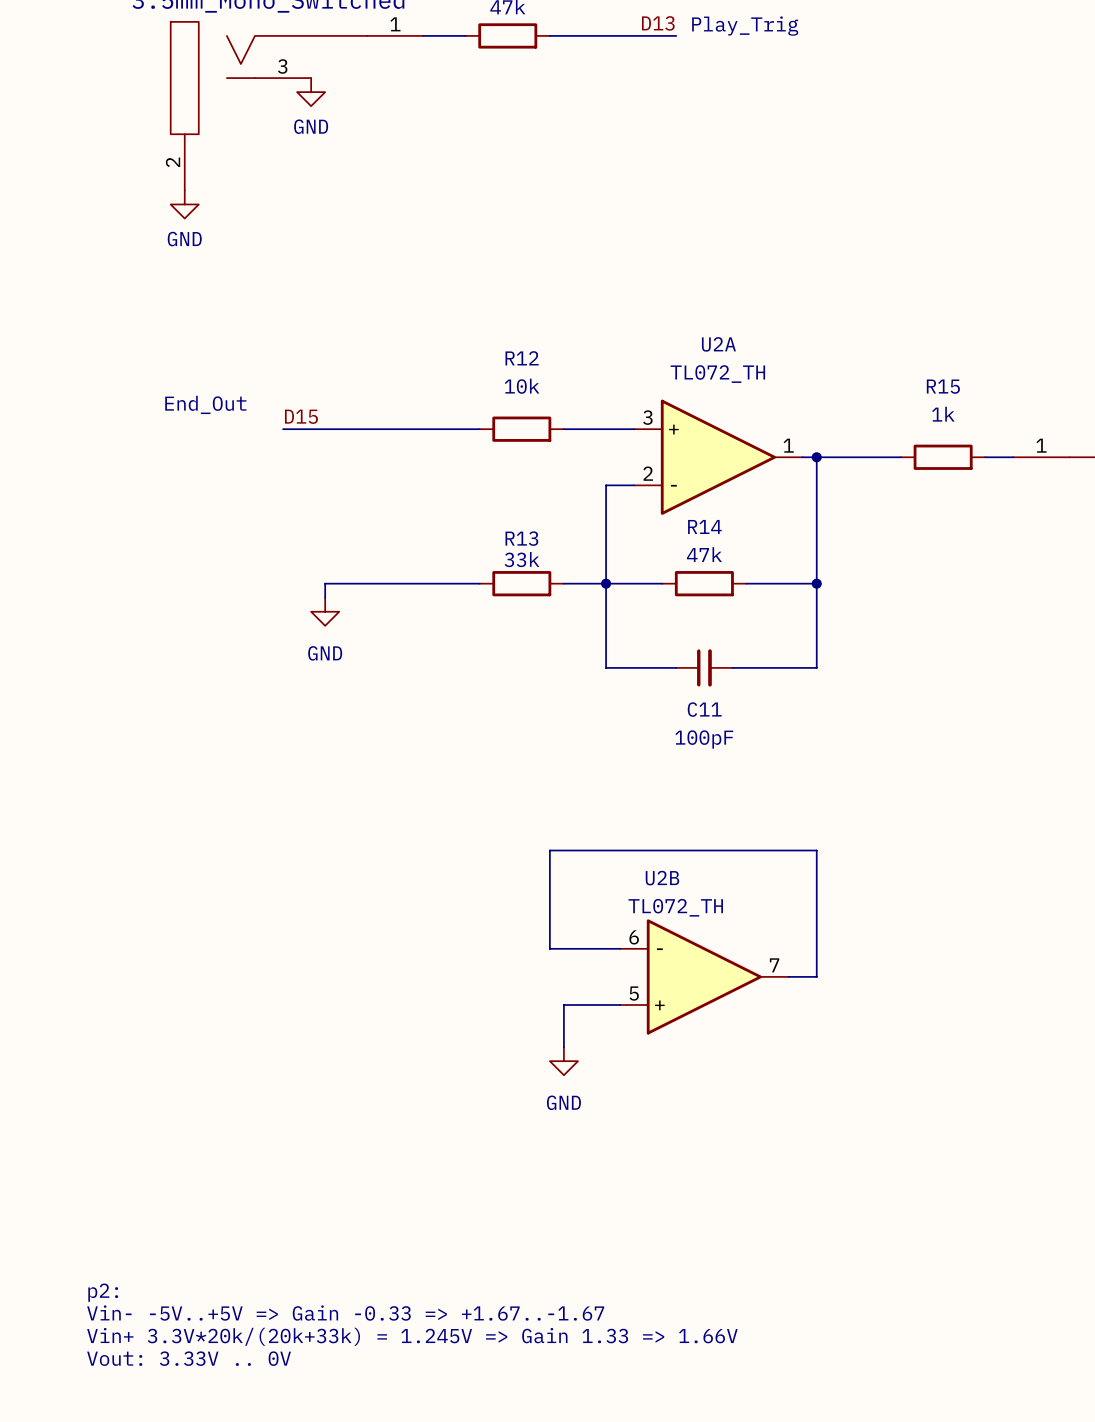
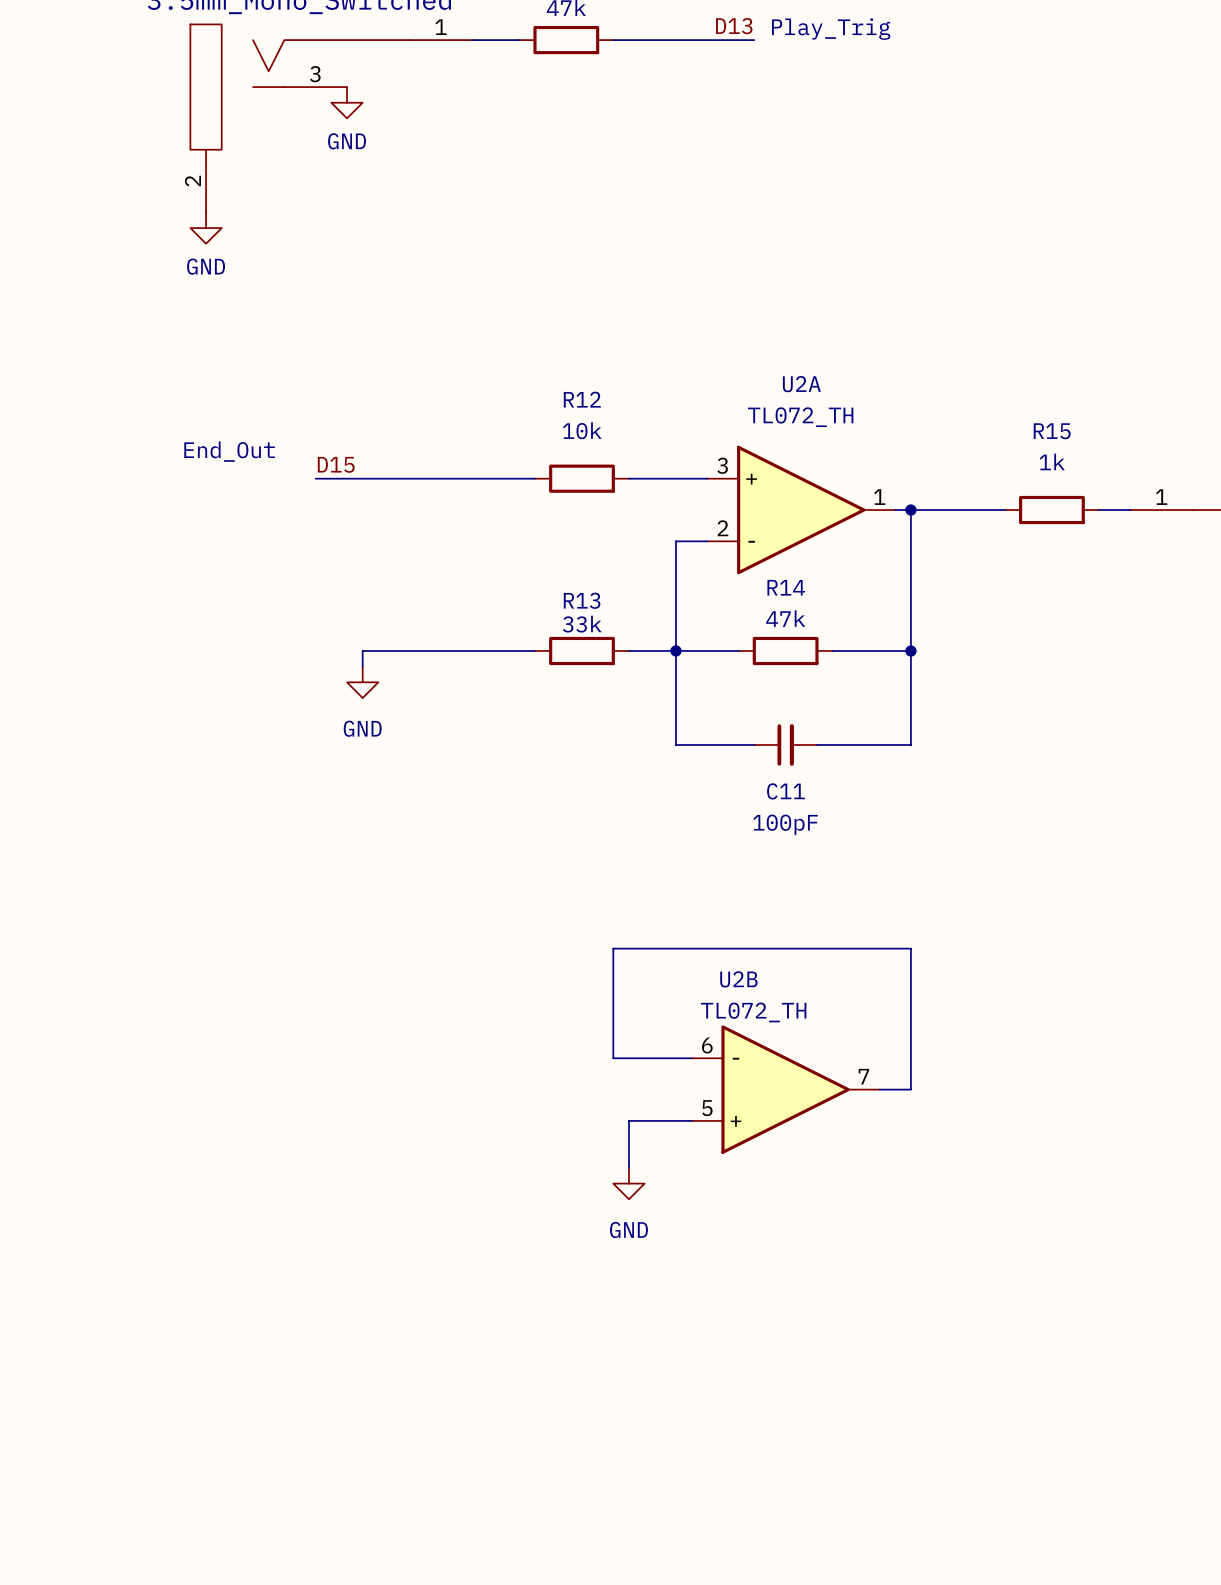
text: p2: (103, 1292) -> none
text: Vin- -5V..+5V => Gain -0.33 => +1.67..-1.67 (345, 1313) -> none
text: Vin+ 3.3V*20k/(20k+33k) = 1.245V => Gain 1.33 => 1.66V (412, 1336) -> none
text: Vout: 3.33V .. 0V (189, 1358) -> none

